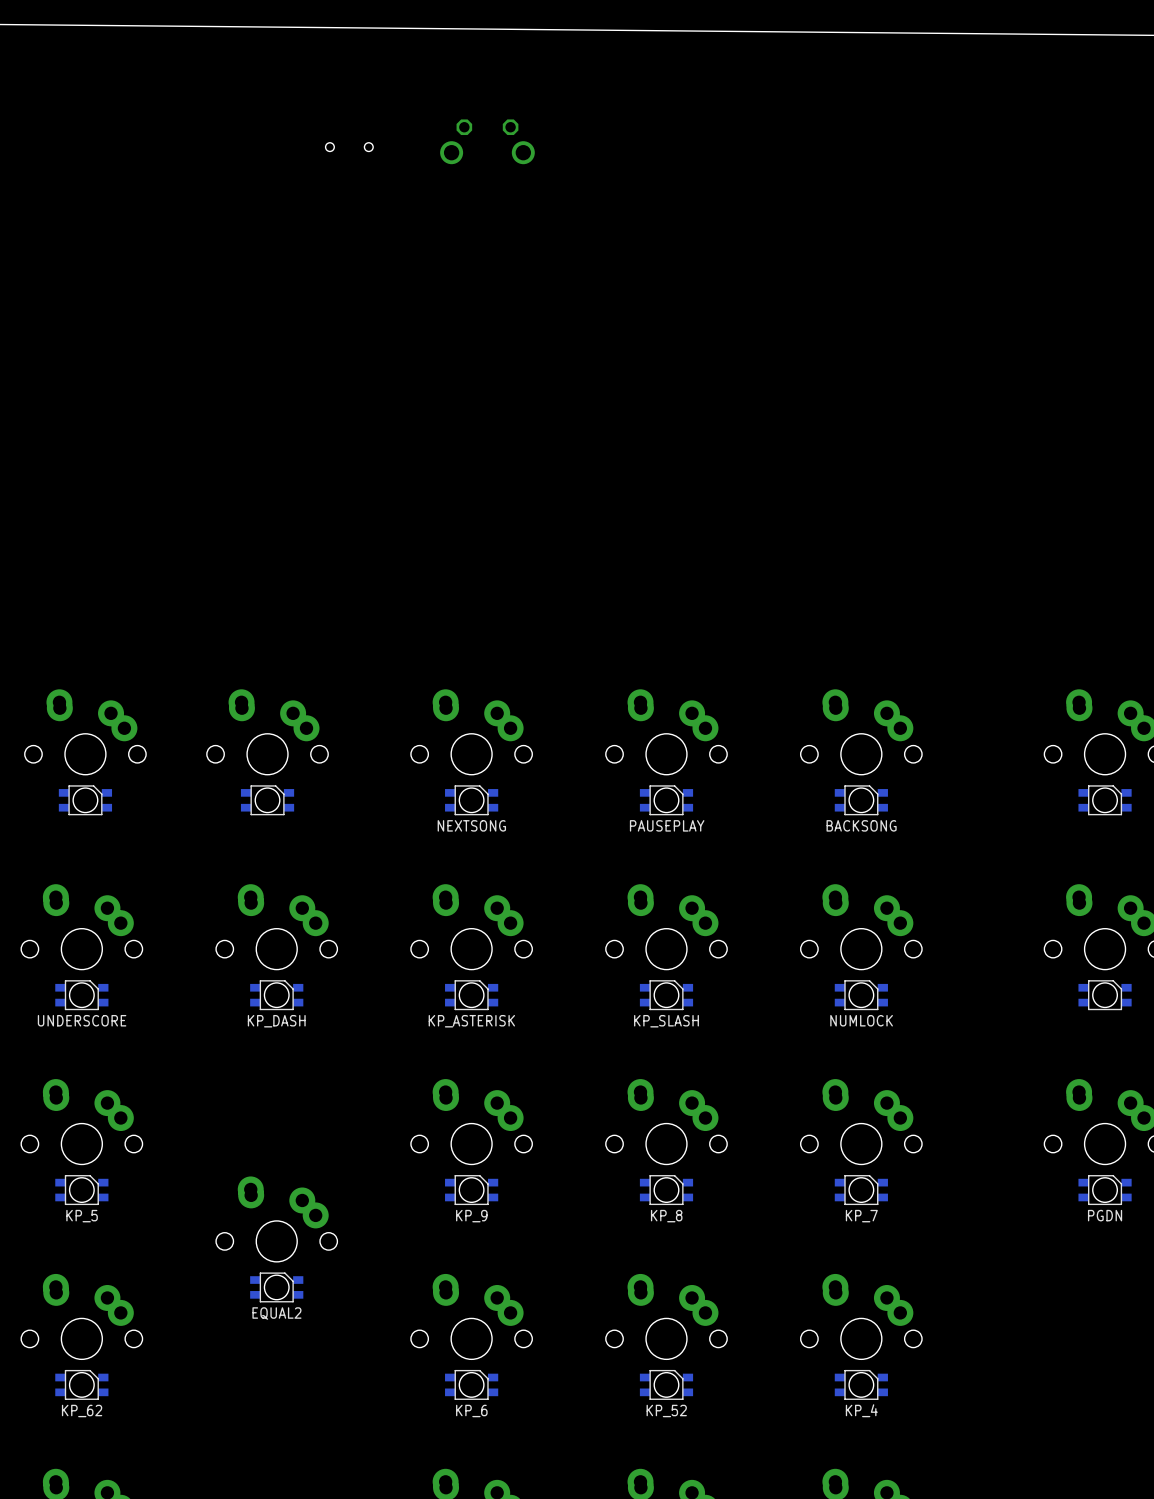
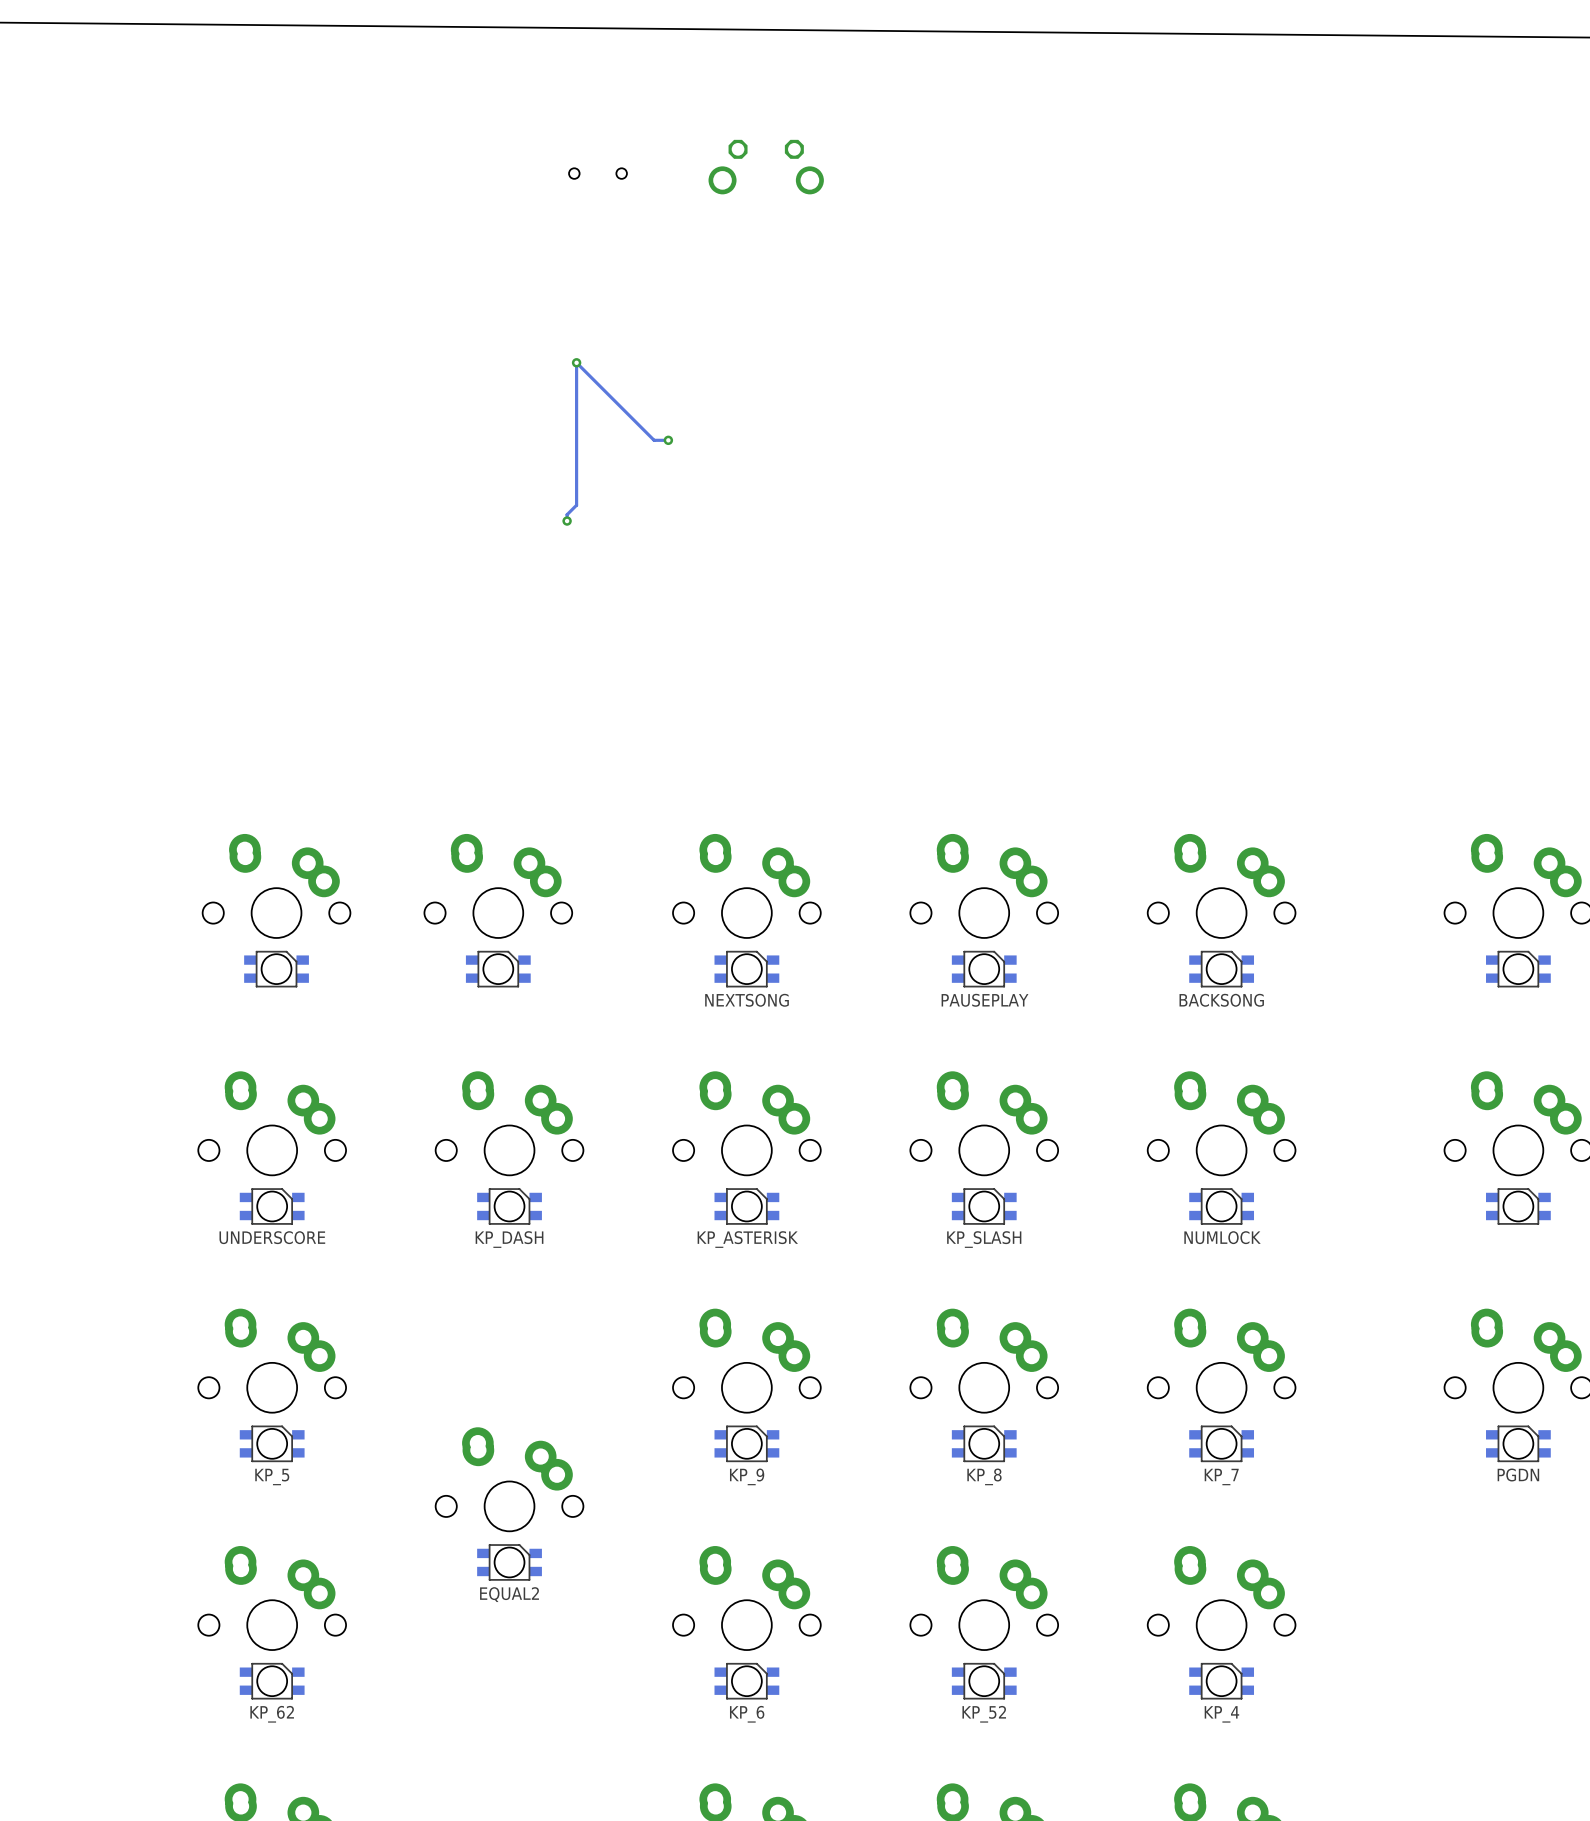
via: none -> (576, 362)
track: none -> (668, 440) (654, 440) (576, 362) (576, 505) (567, 514) (567, 521)
via: none -> (668, 440)
via: none -> (567, 521)

